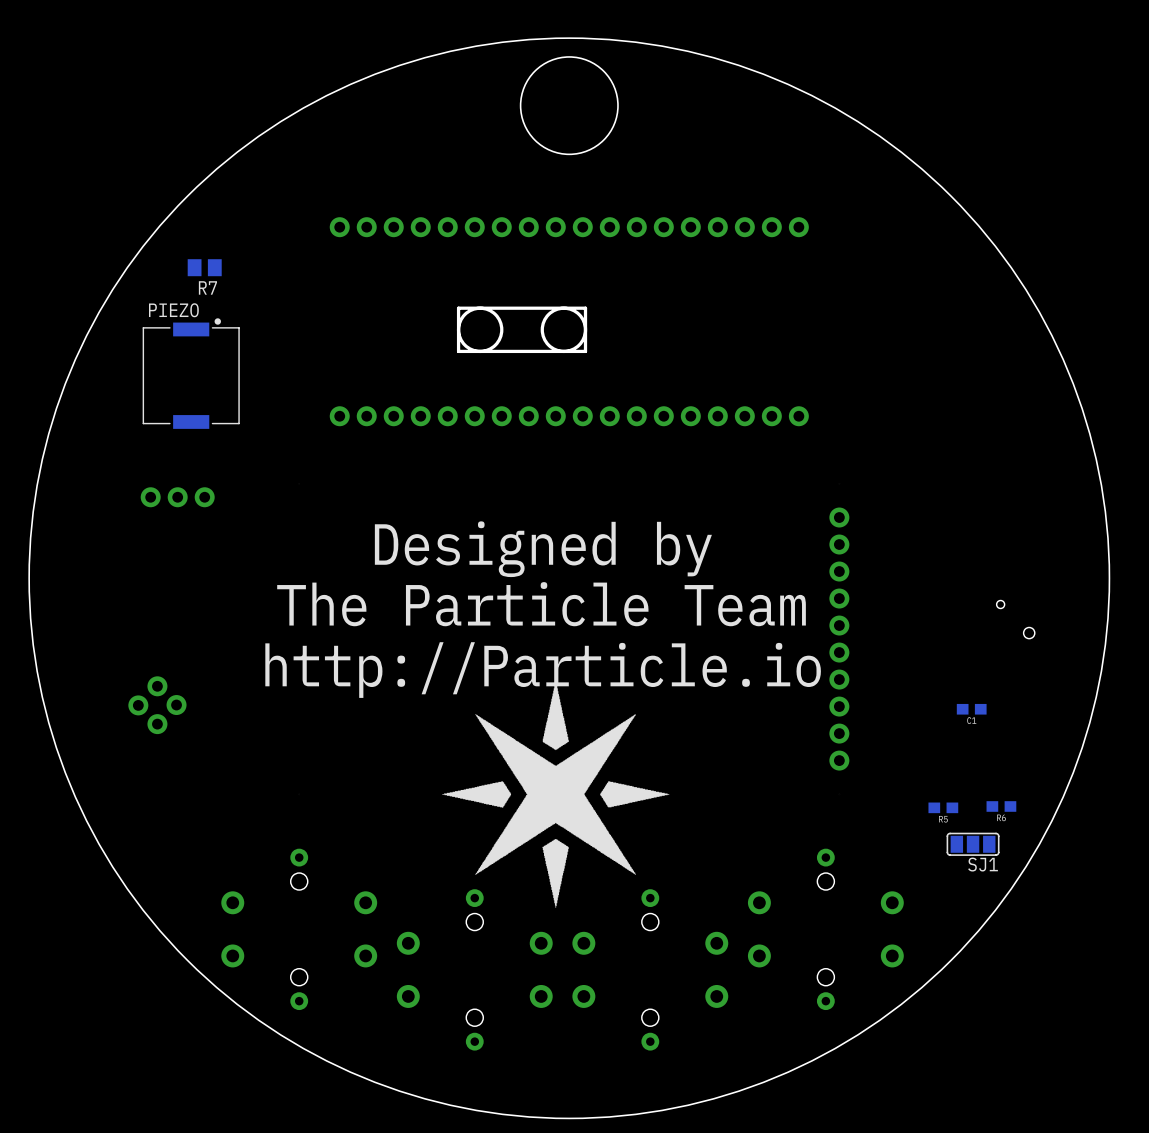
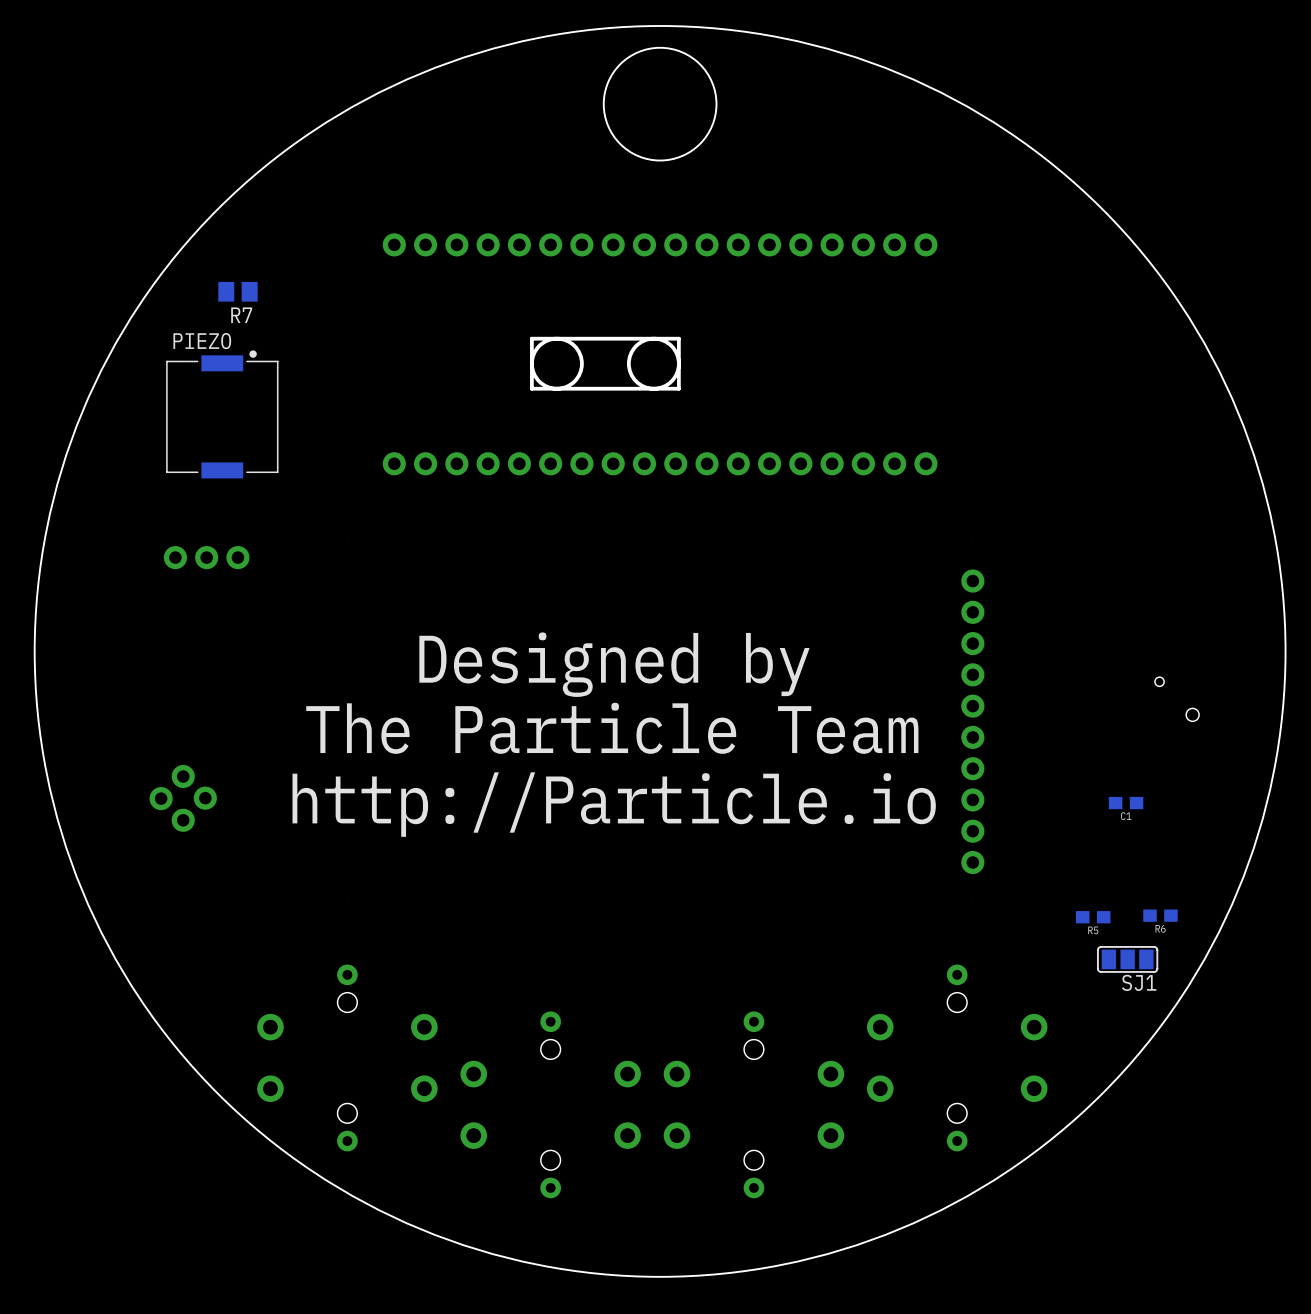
text position: Designed by (543, 549) -> Designed by (614, 664)
text position: The Particle Team (541, 604) -> The Particle Team (612, 728)
text position: http://Particle.io (543, 670) -> http://Particle.io (614, 804)
drawing: [442, 680, 670, 908] -> none

